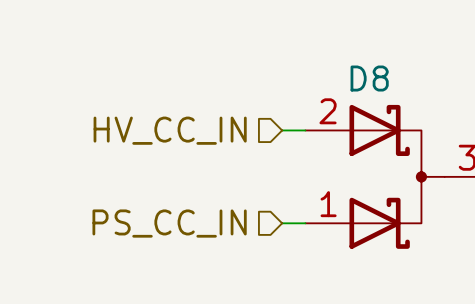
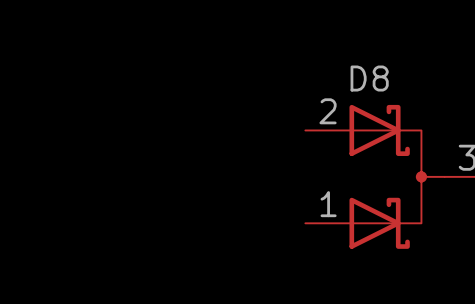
hierarchical label: HV_CC_IN (170, 130) -> none
wire: (282, 130) (305, 130) -> none
hierarchical label: PS_CC_IN (169, 223) -> none
wire: (282, 223) (305, 223) -> none

